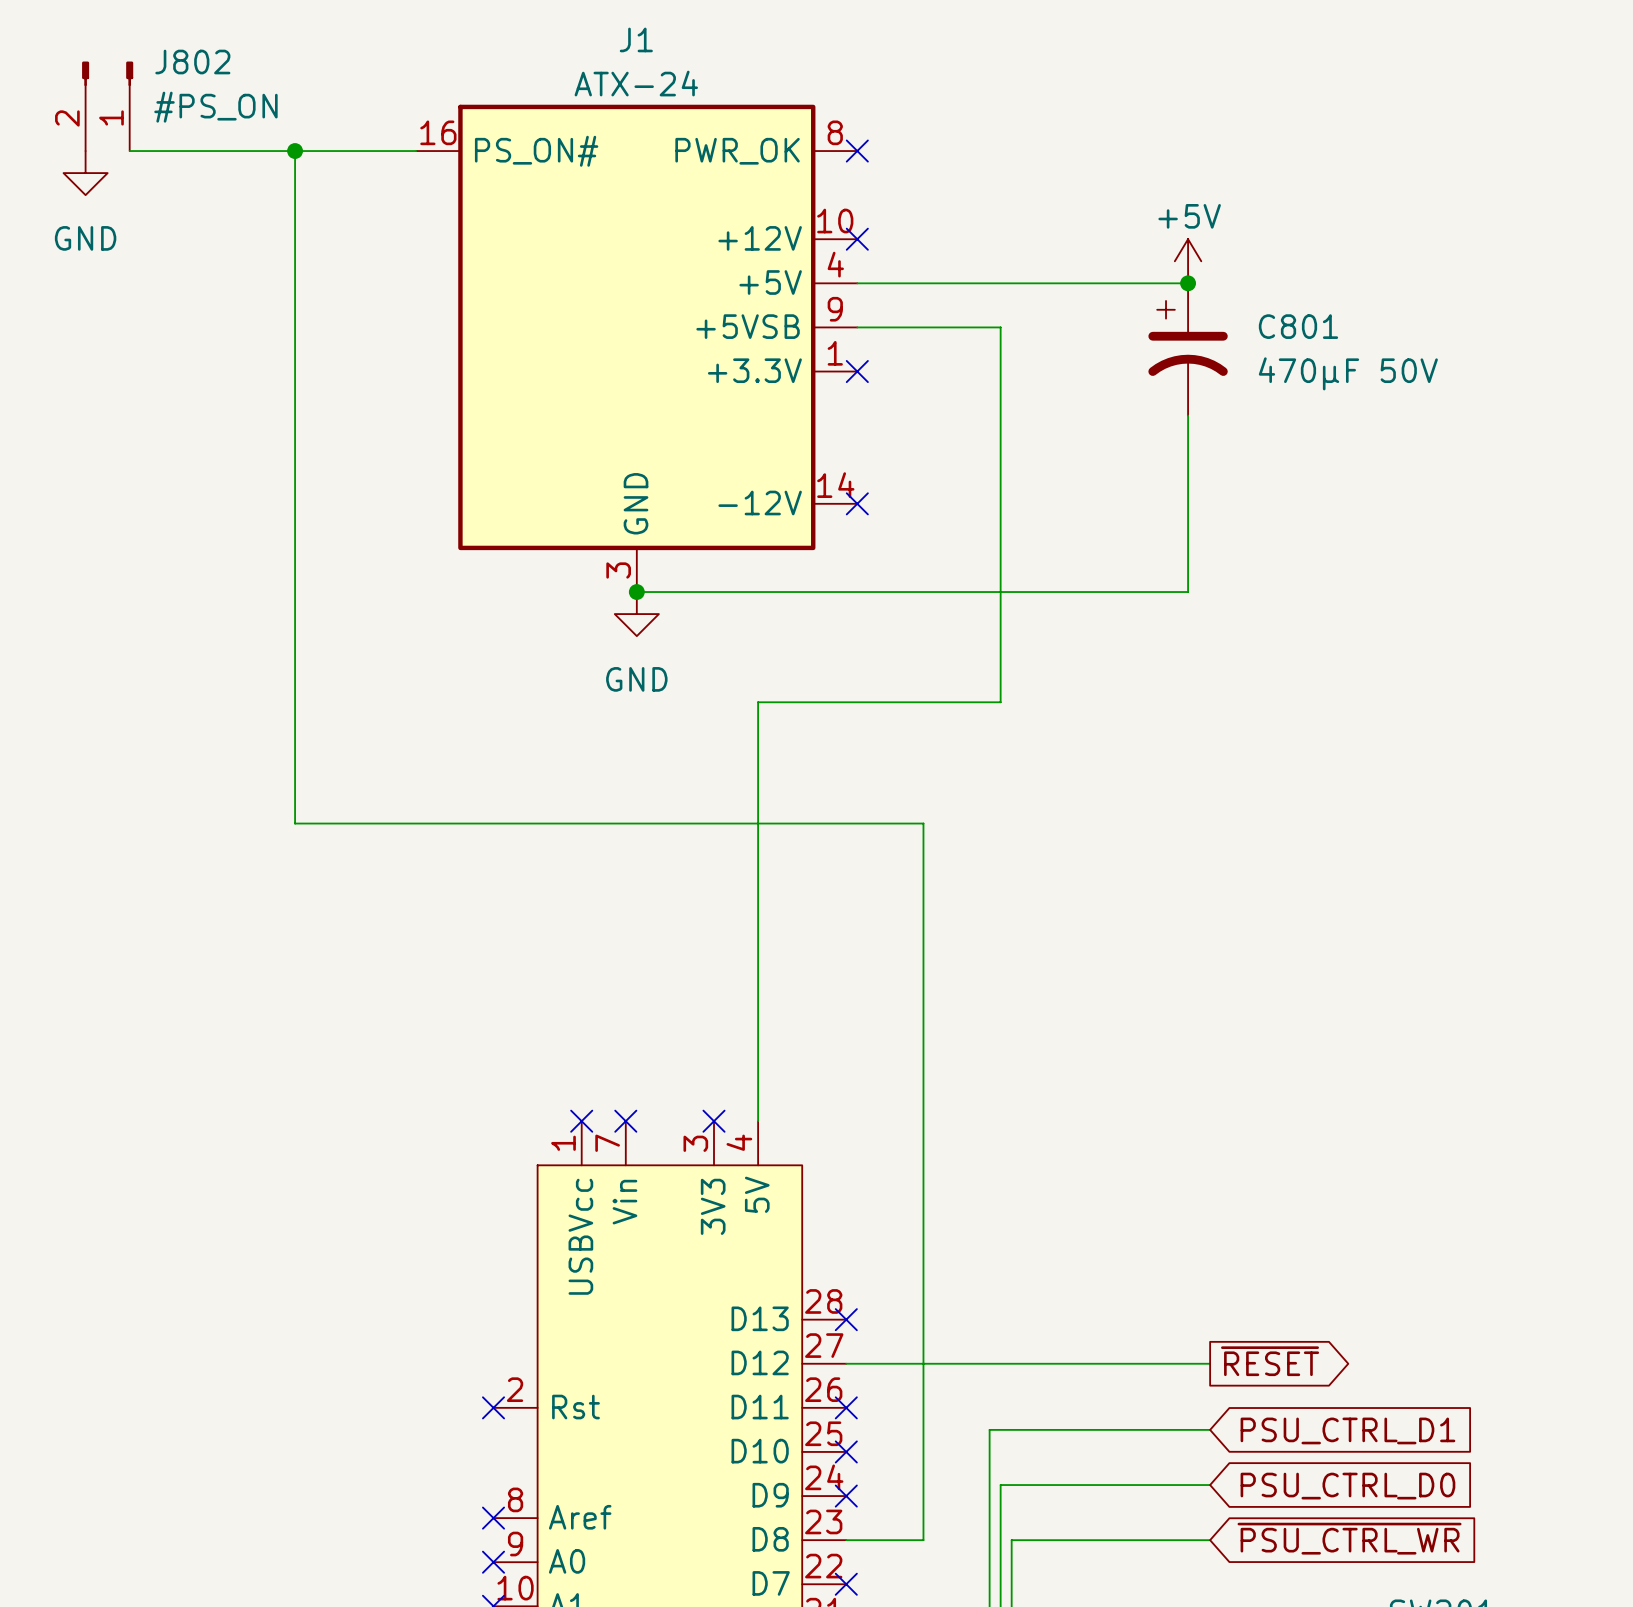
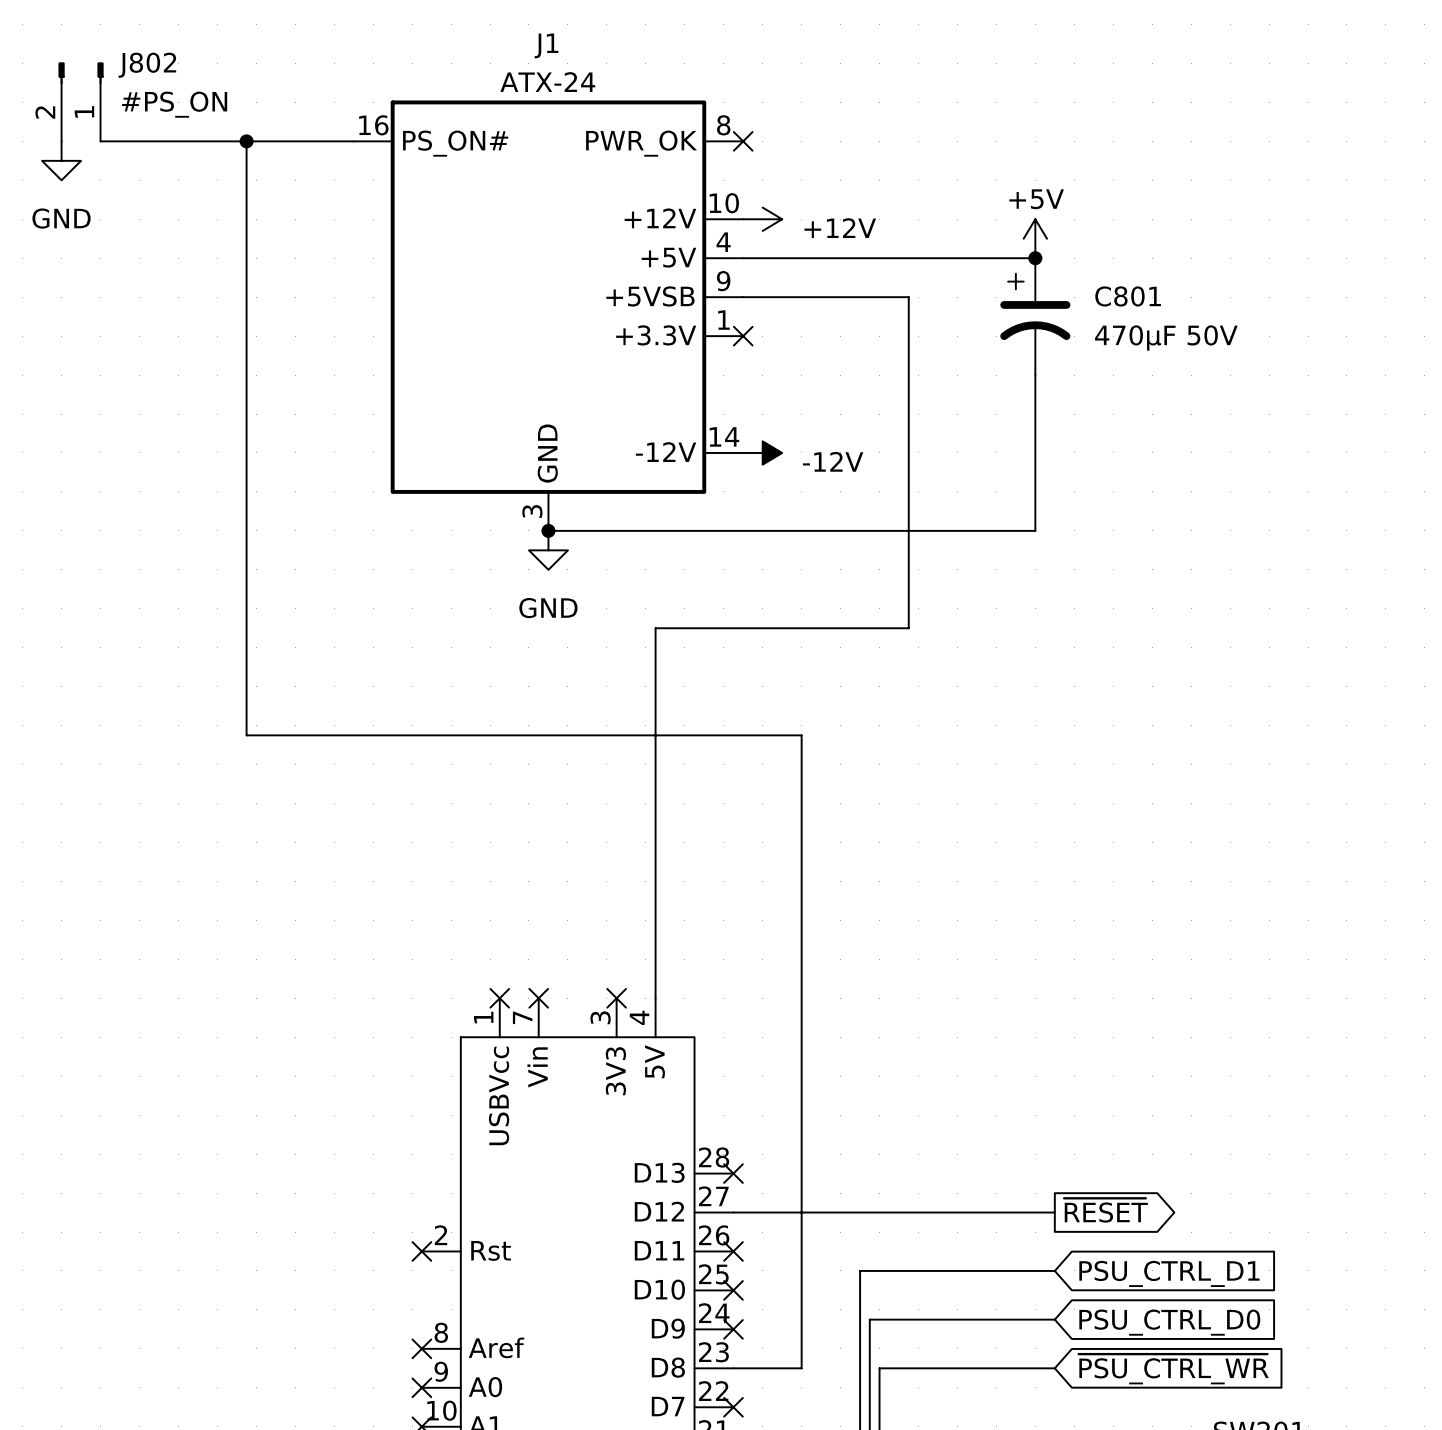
no-connect mark: (857, 239) -> none
power symbol: none -> +12V (762, 219)
wire: (1000, 327) (1000, 702) -> (869, 297) (908, 297) (908, 628) (869, 628)
no-connect mark: (857, 503) -> none
power symbol: none -> -12V (762, 452)

